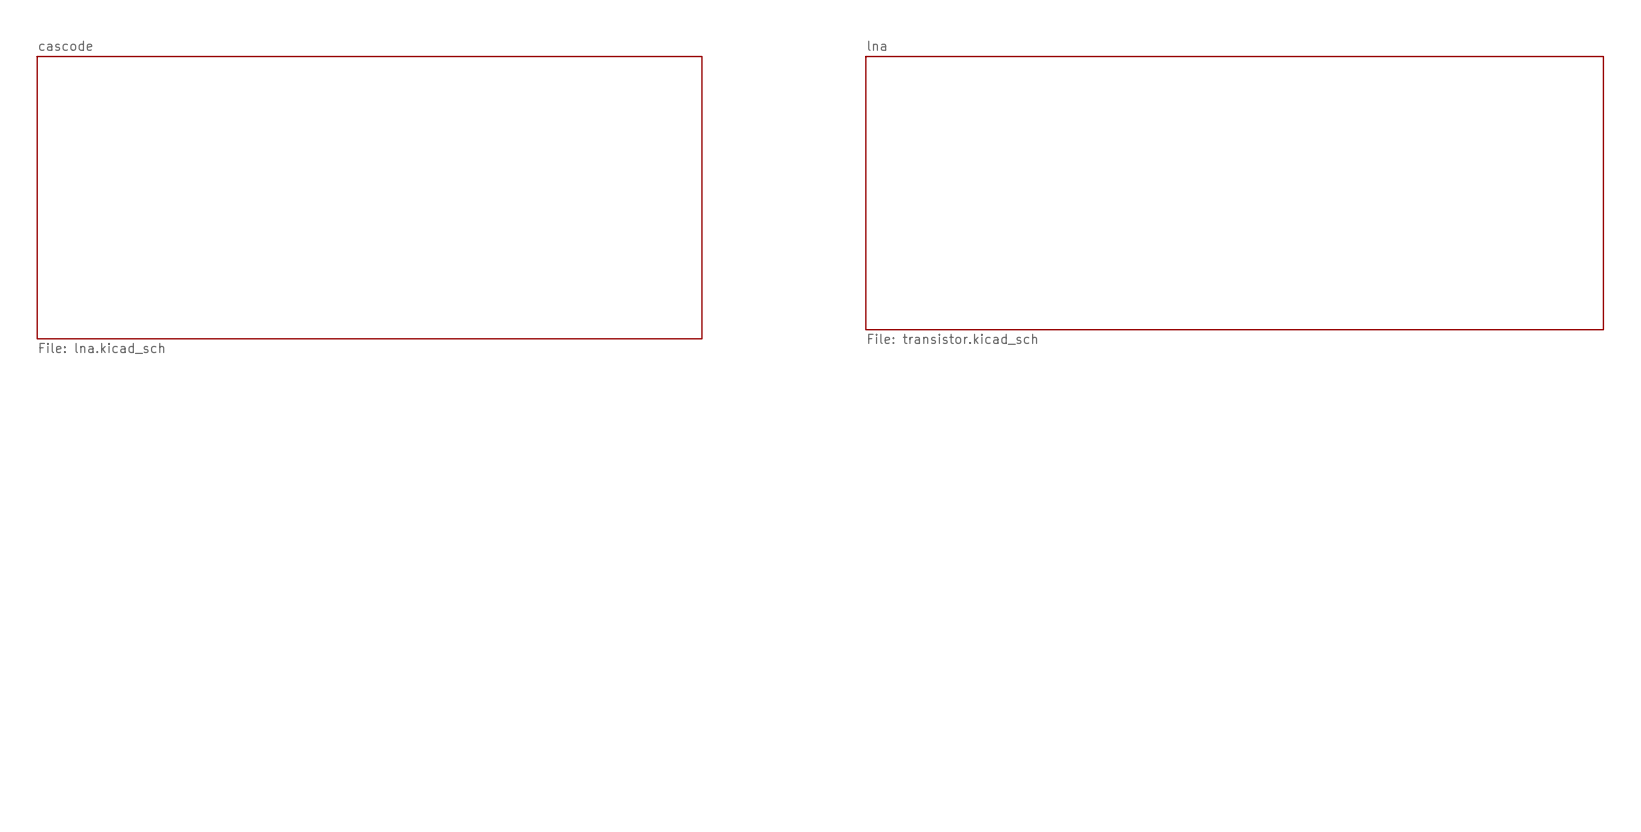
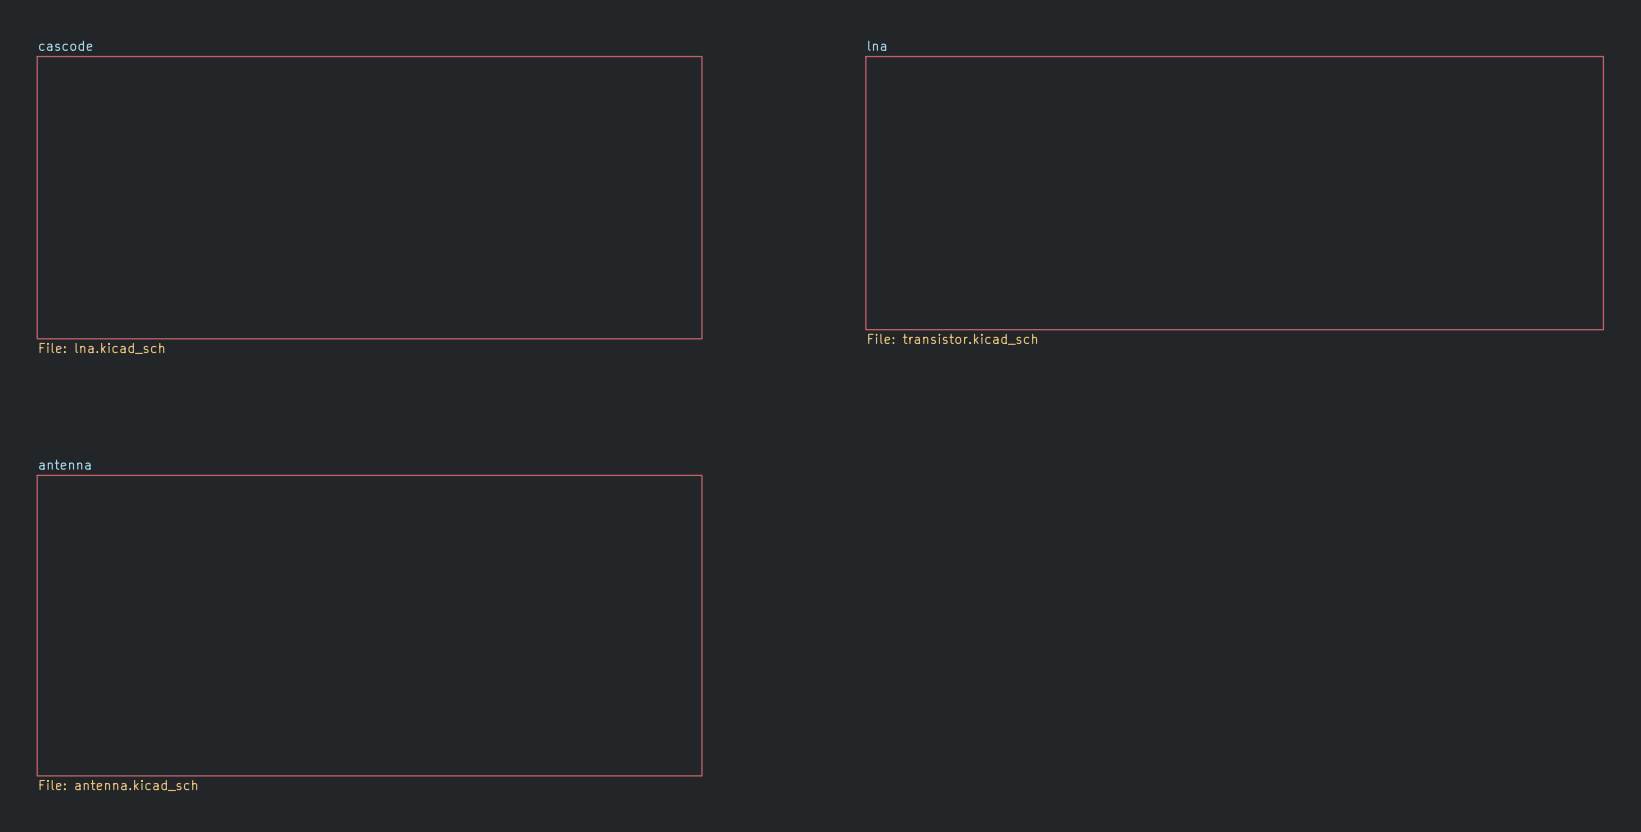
sheet antenna: none -> File: antenna.kicad_sch (369, 625)

